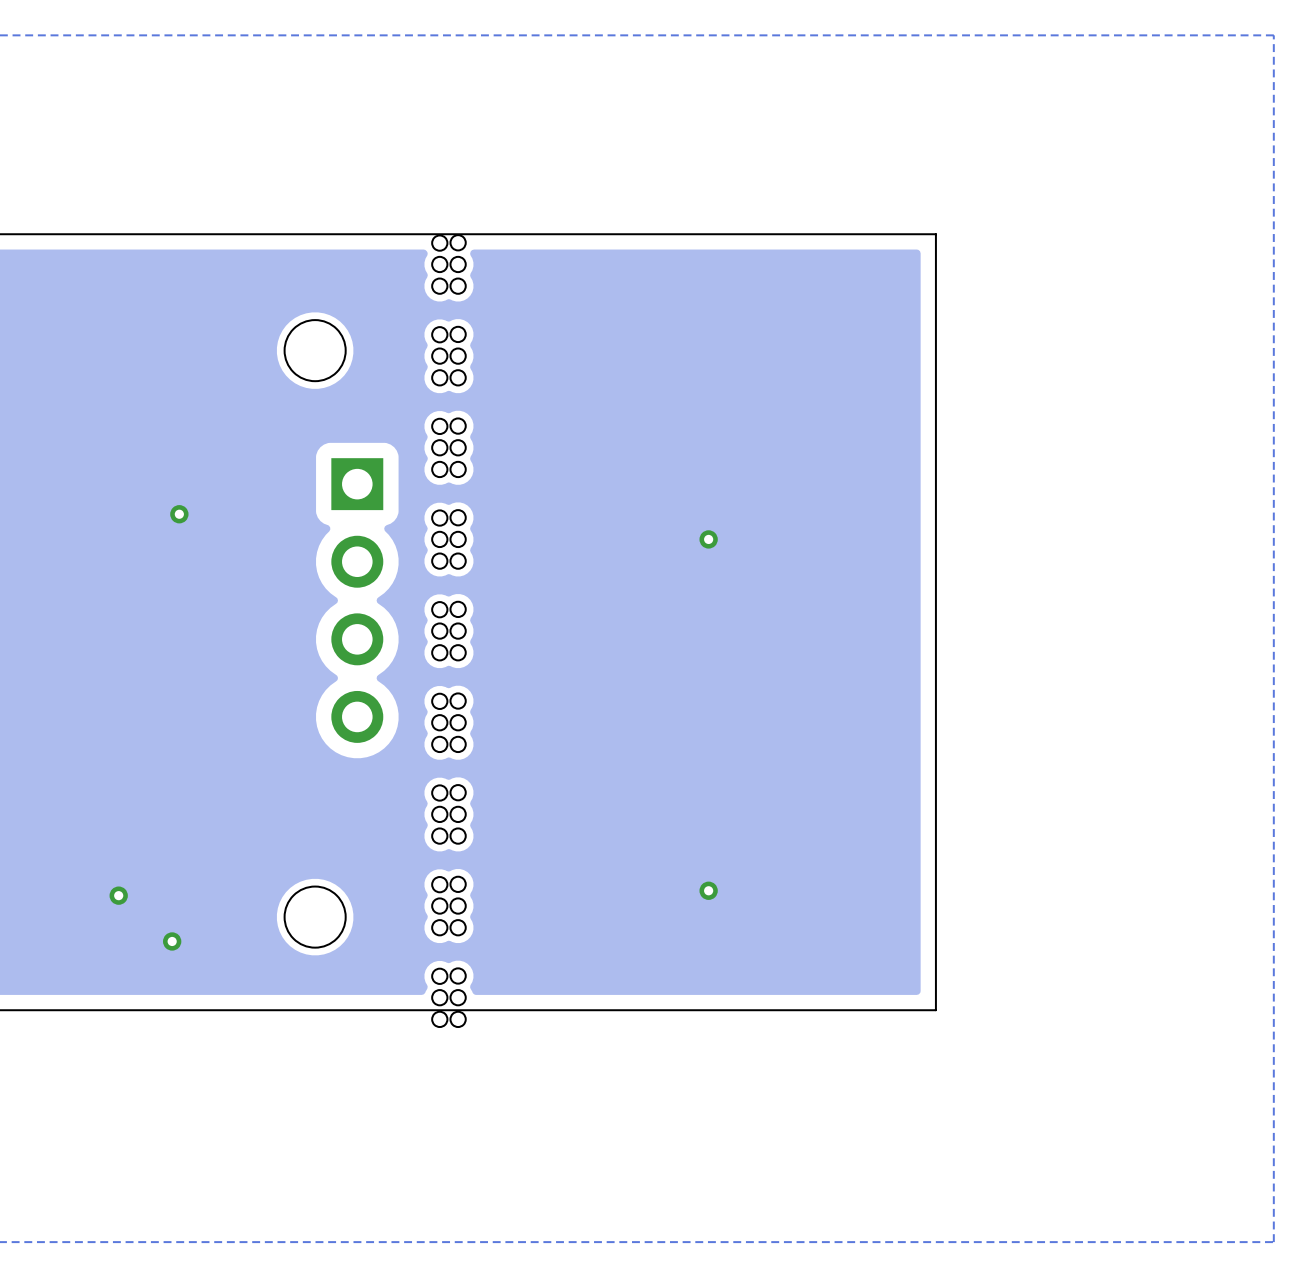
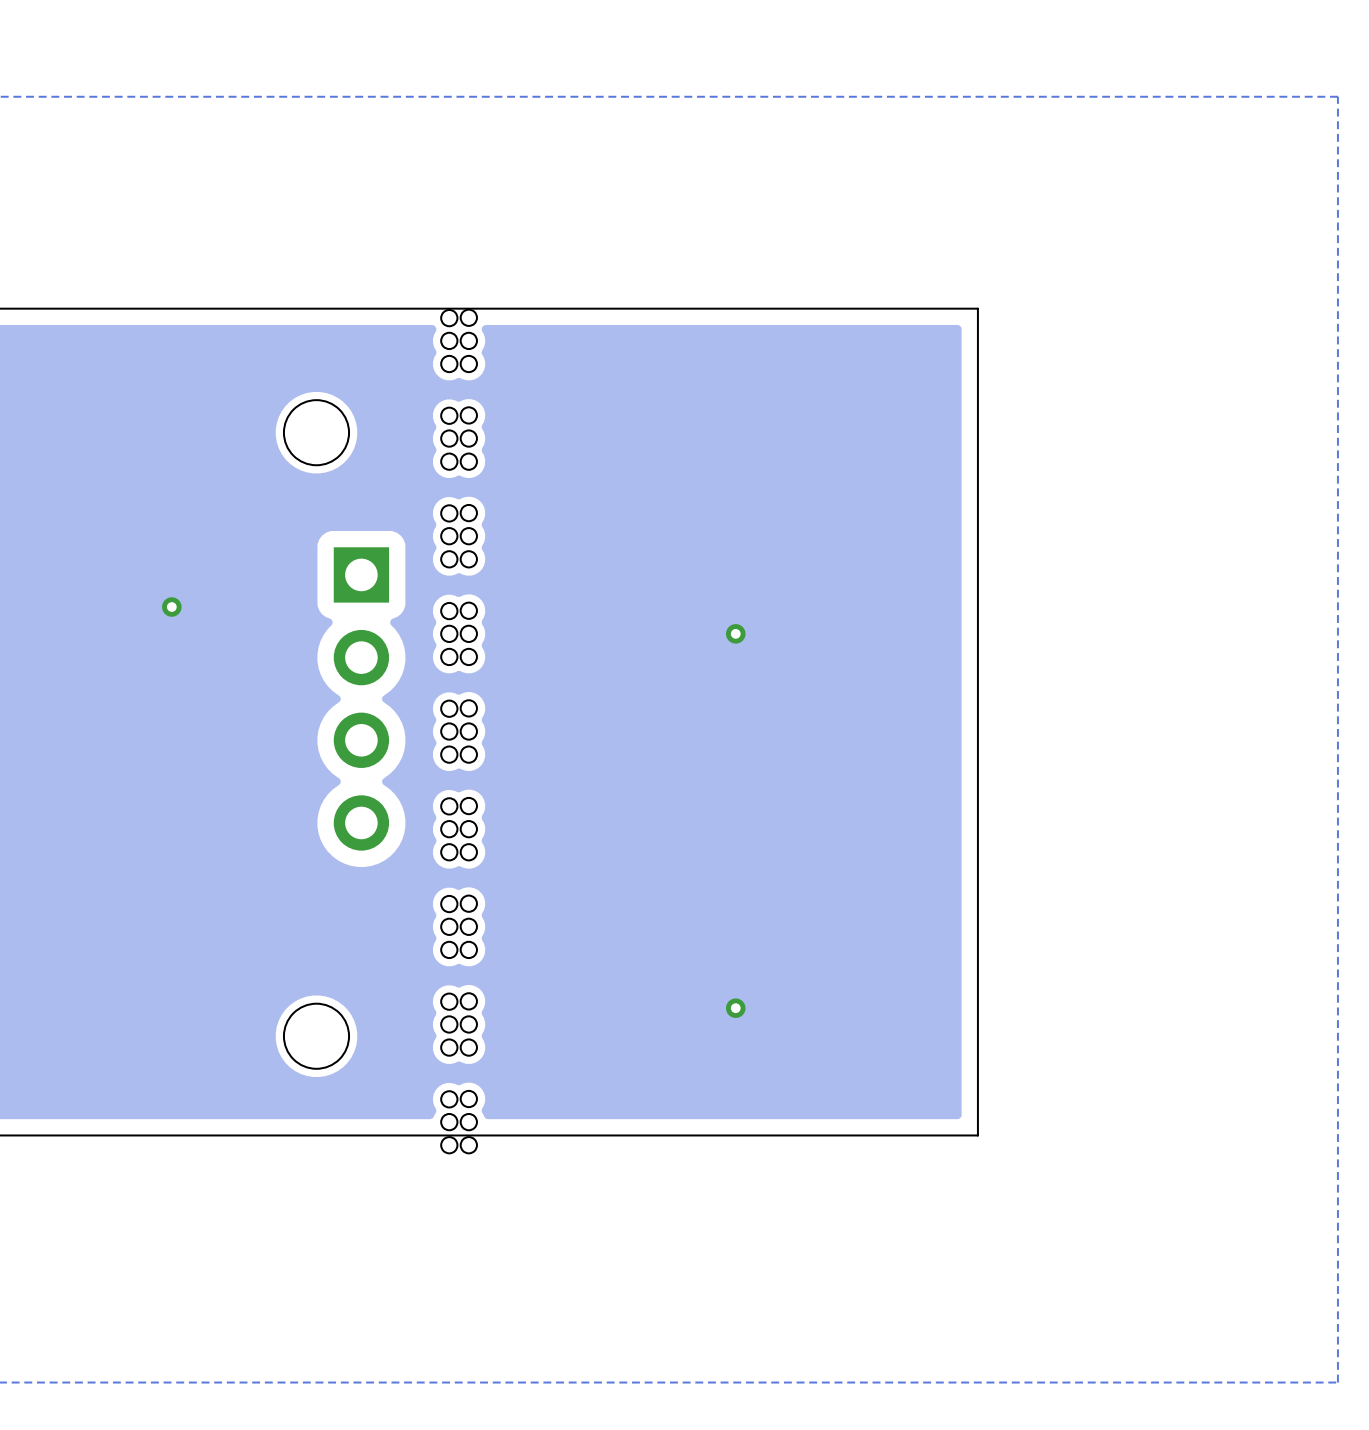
via: (118, 895) -> none
via: (172, 941) -> none

